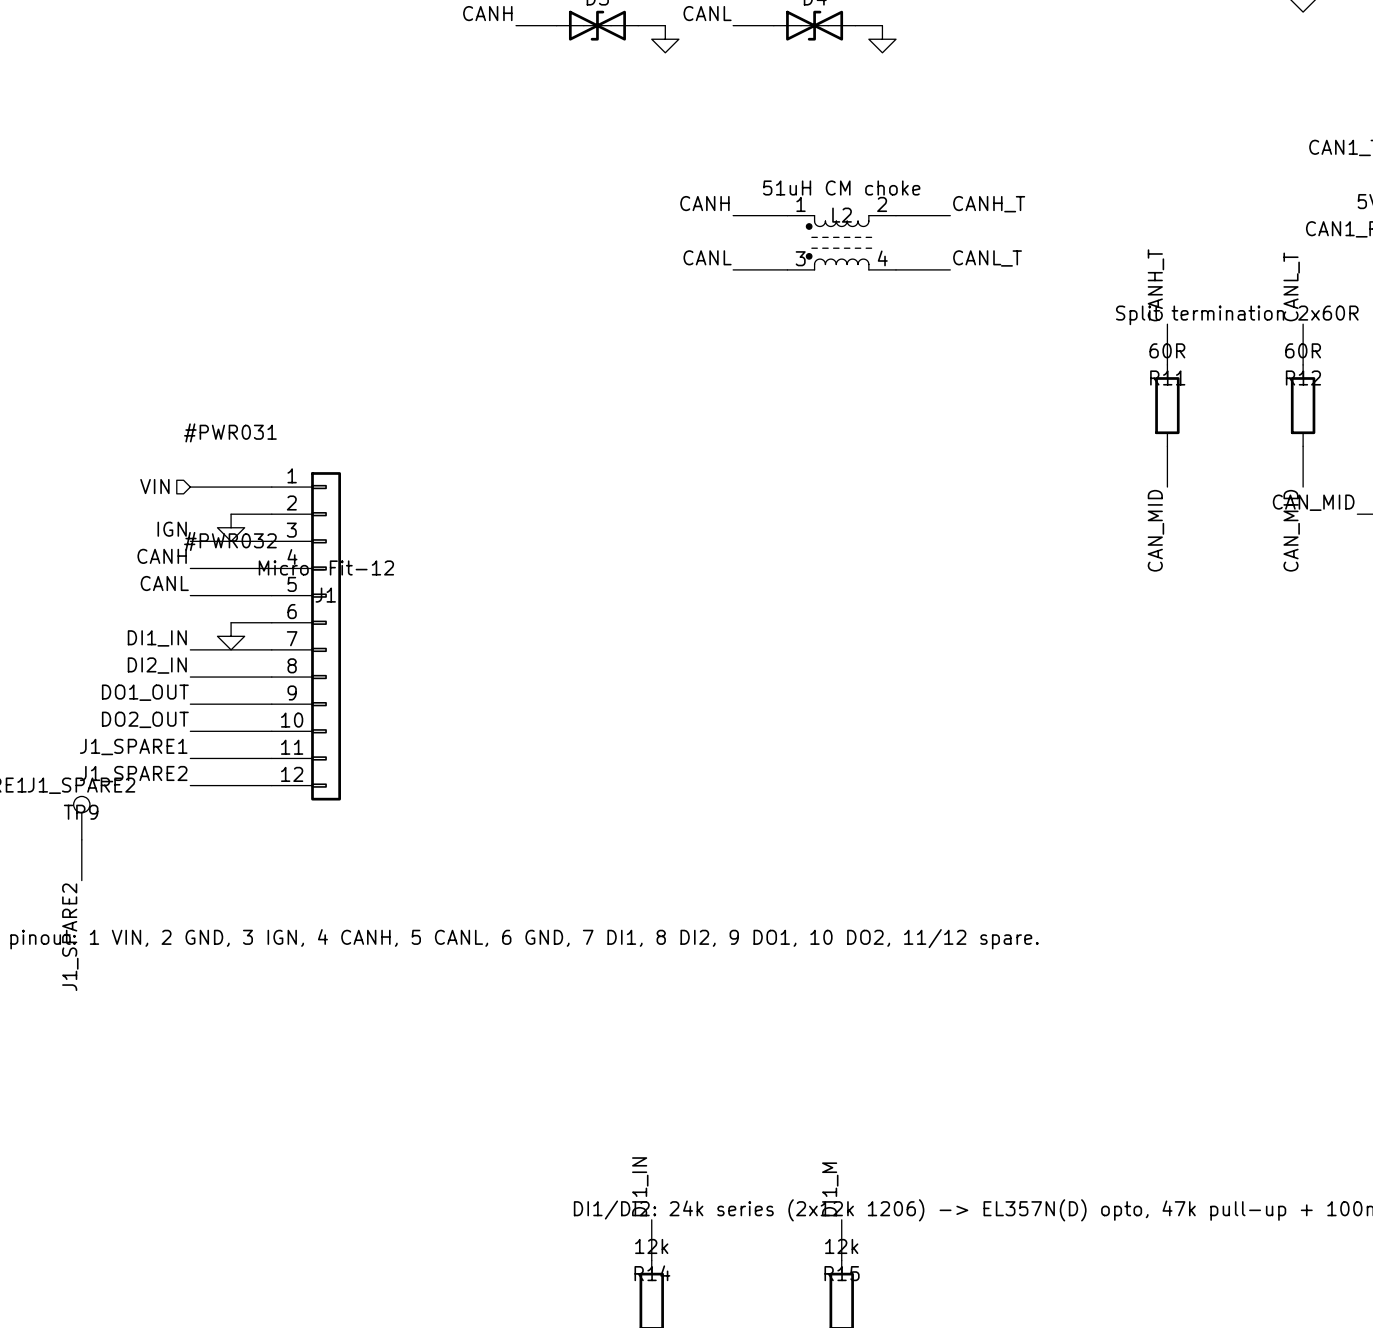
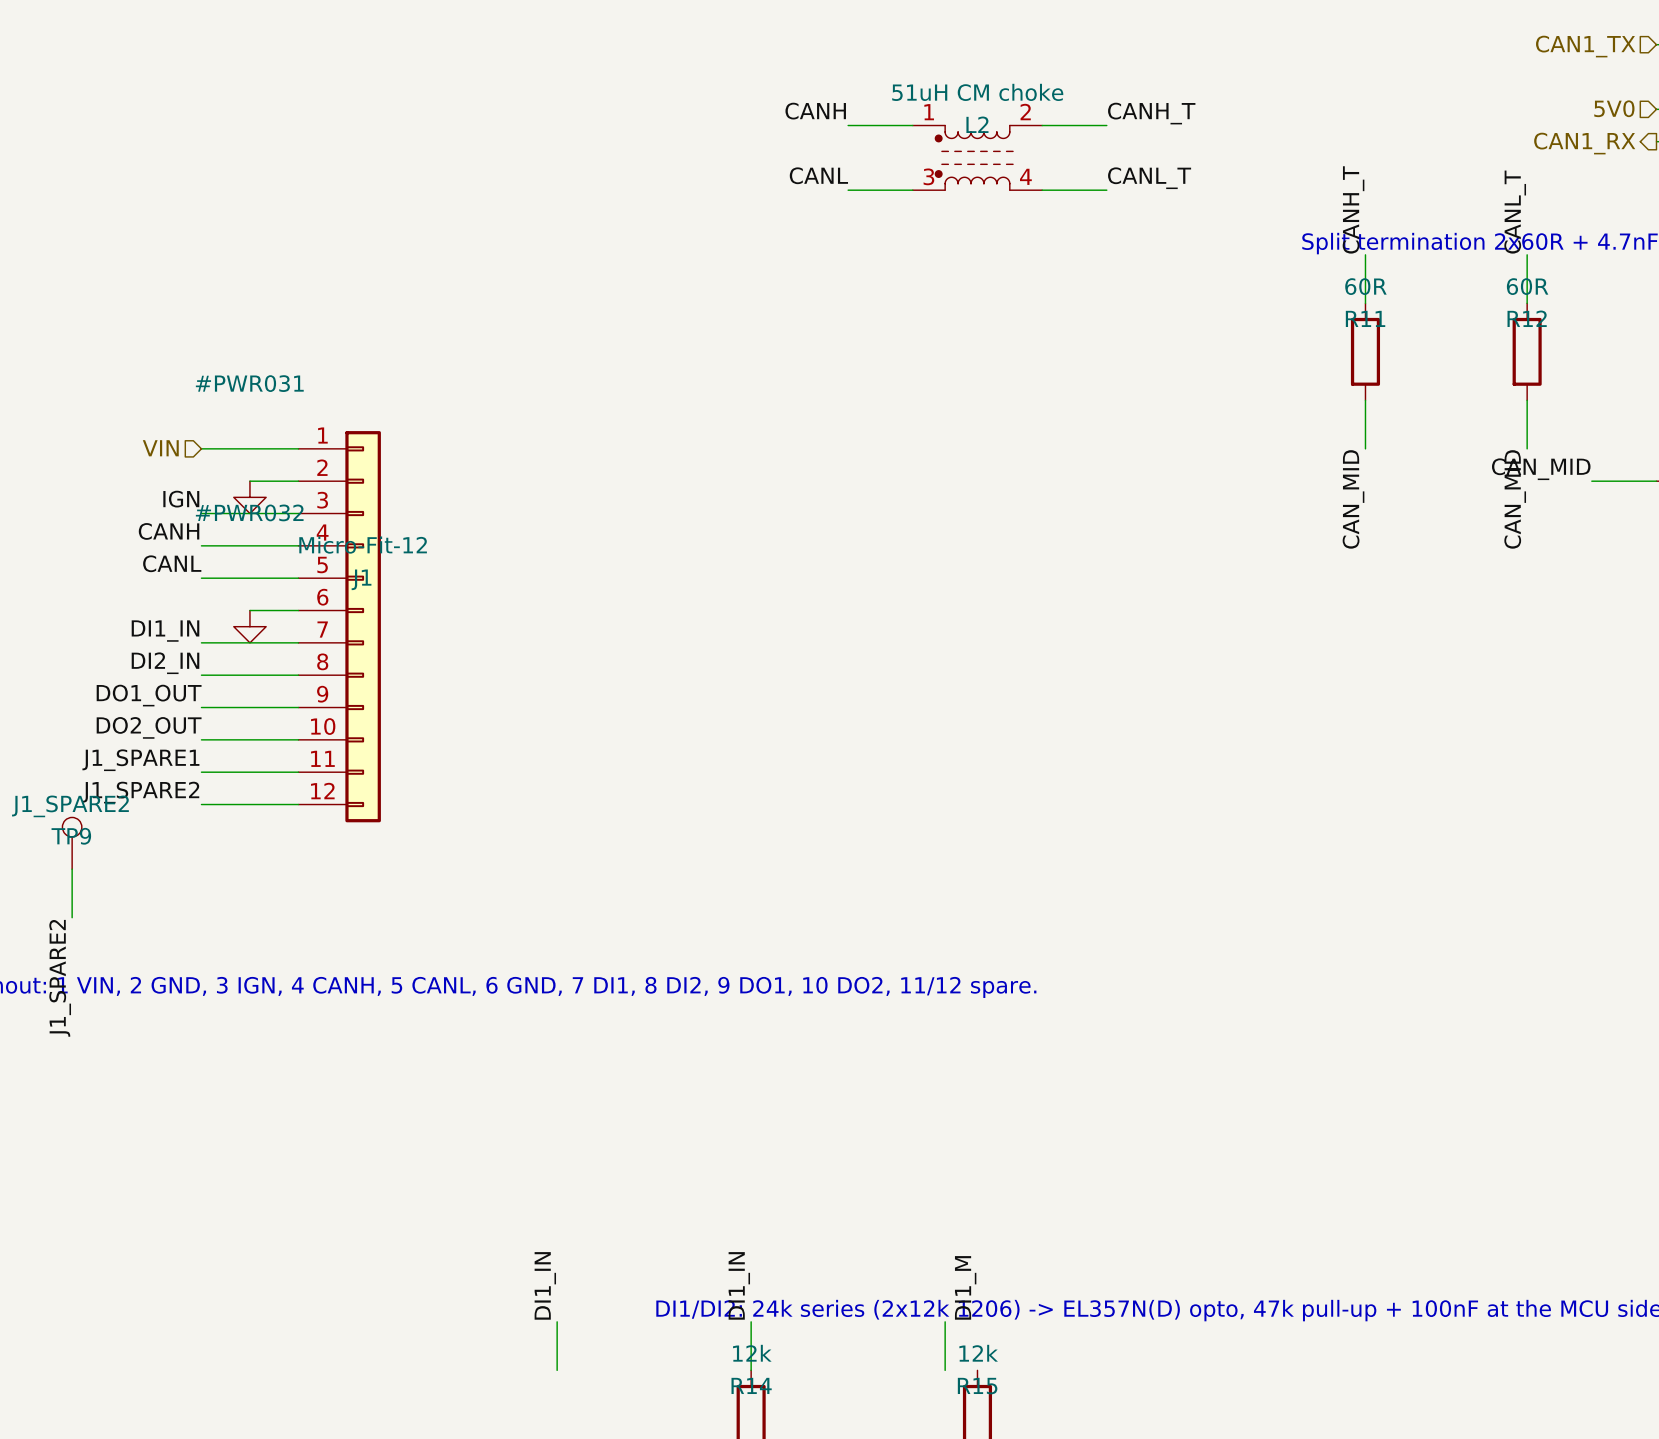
label: none -> DI1_IN (545, 1285)
wire: none -> (557, 1321) (557, 1370)
wire: (841, 1219) (841, 1260) -> (945, 1321) (945, 1370)

